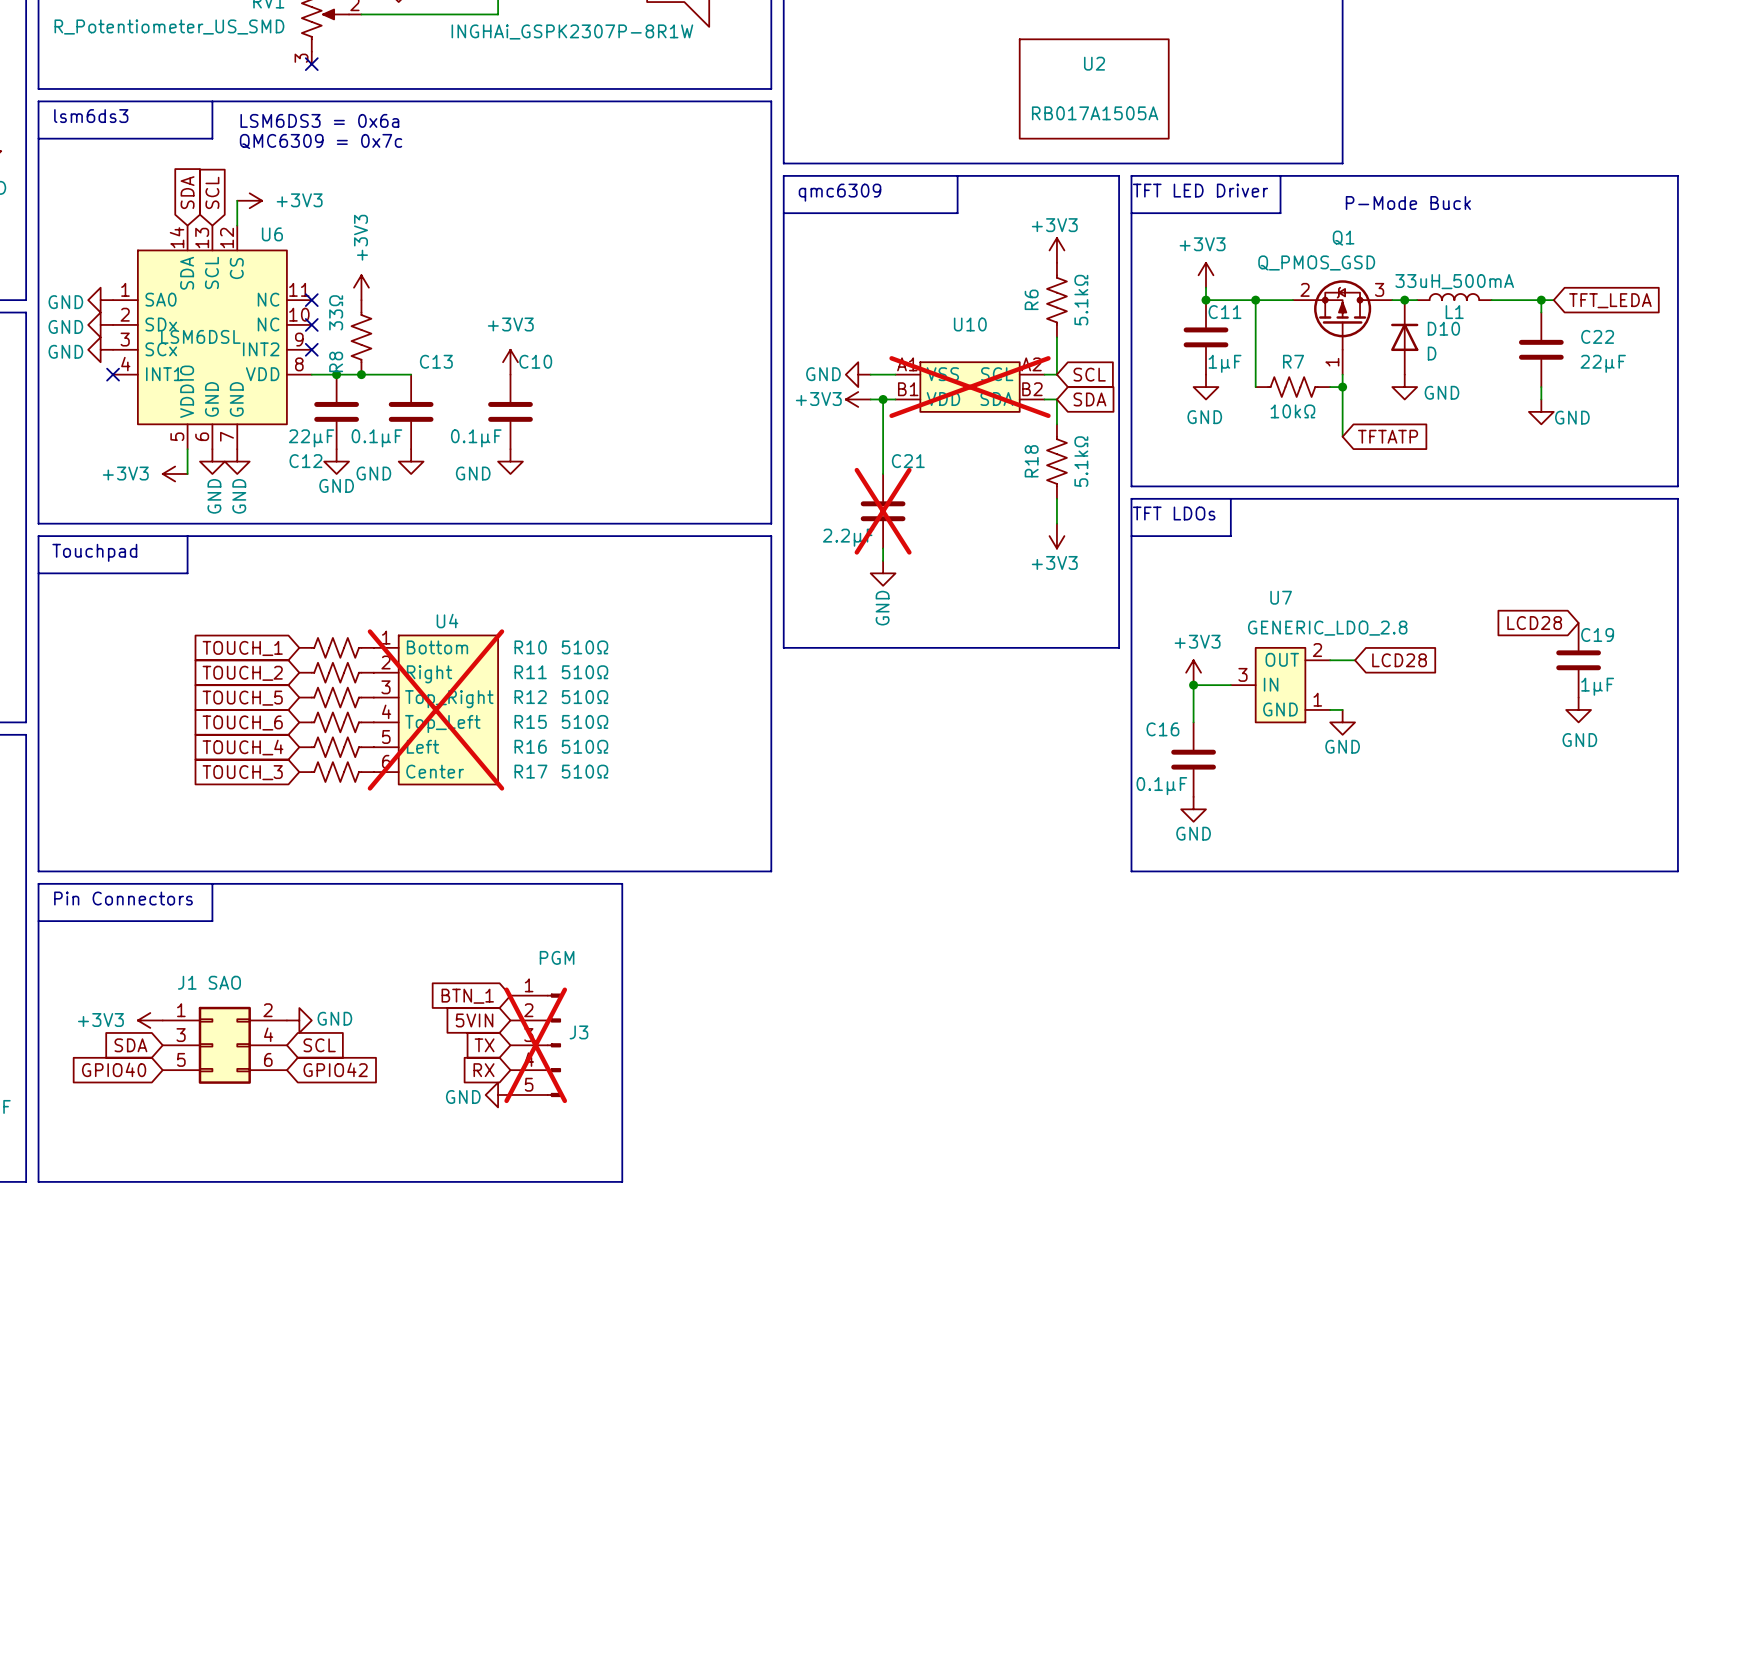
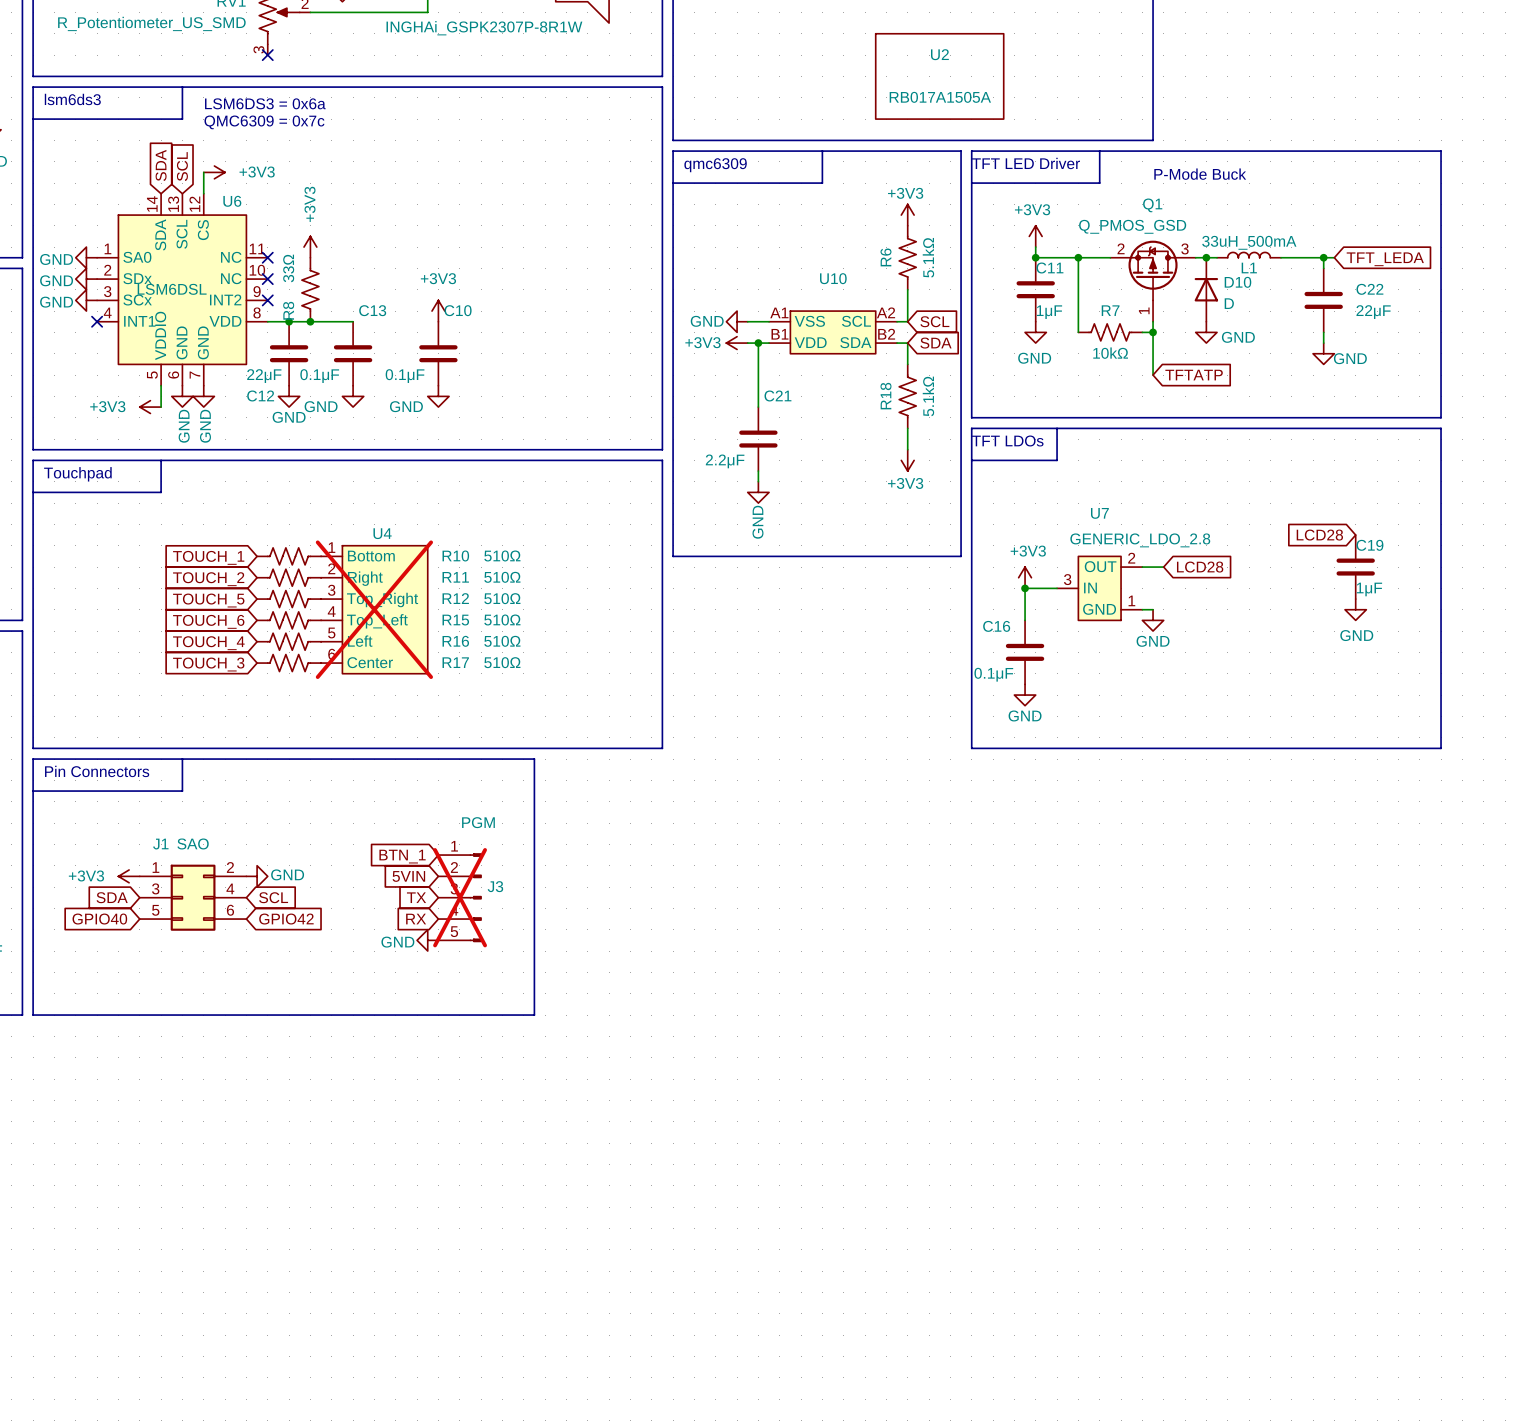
U10 do-not-place cross: (970, 387) -> none
C21 do-not-place cross: (883, 511) -> none

